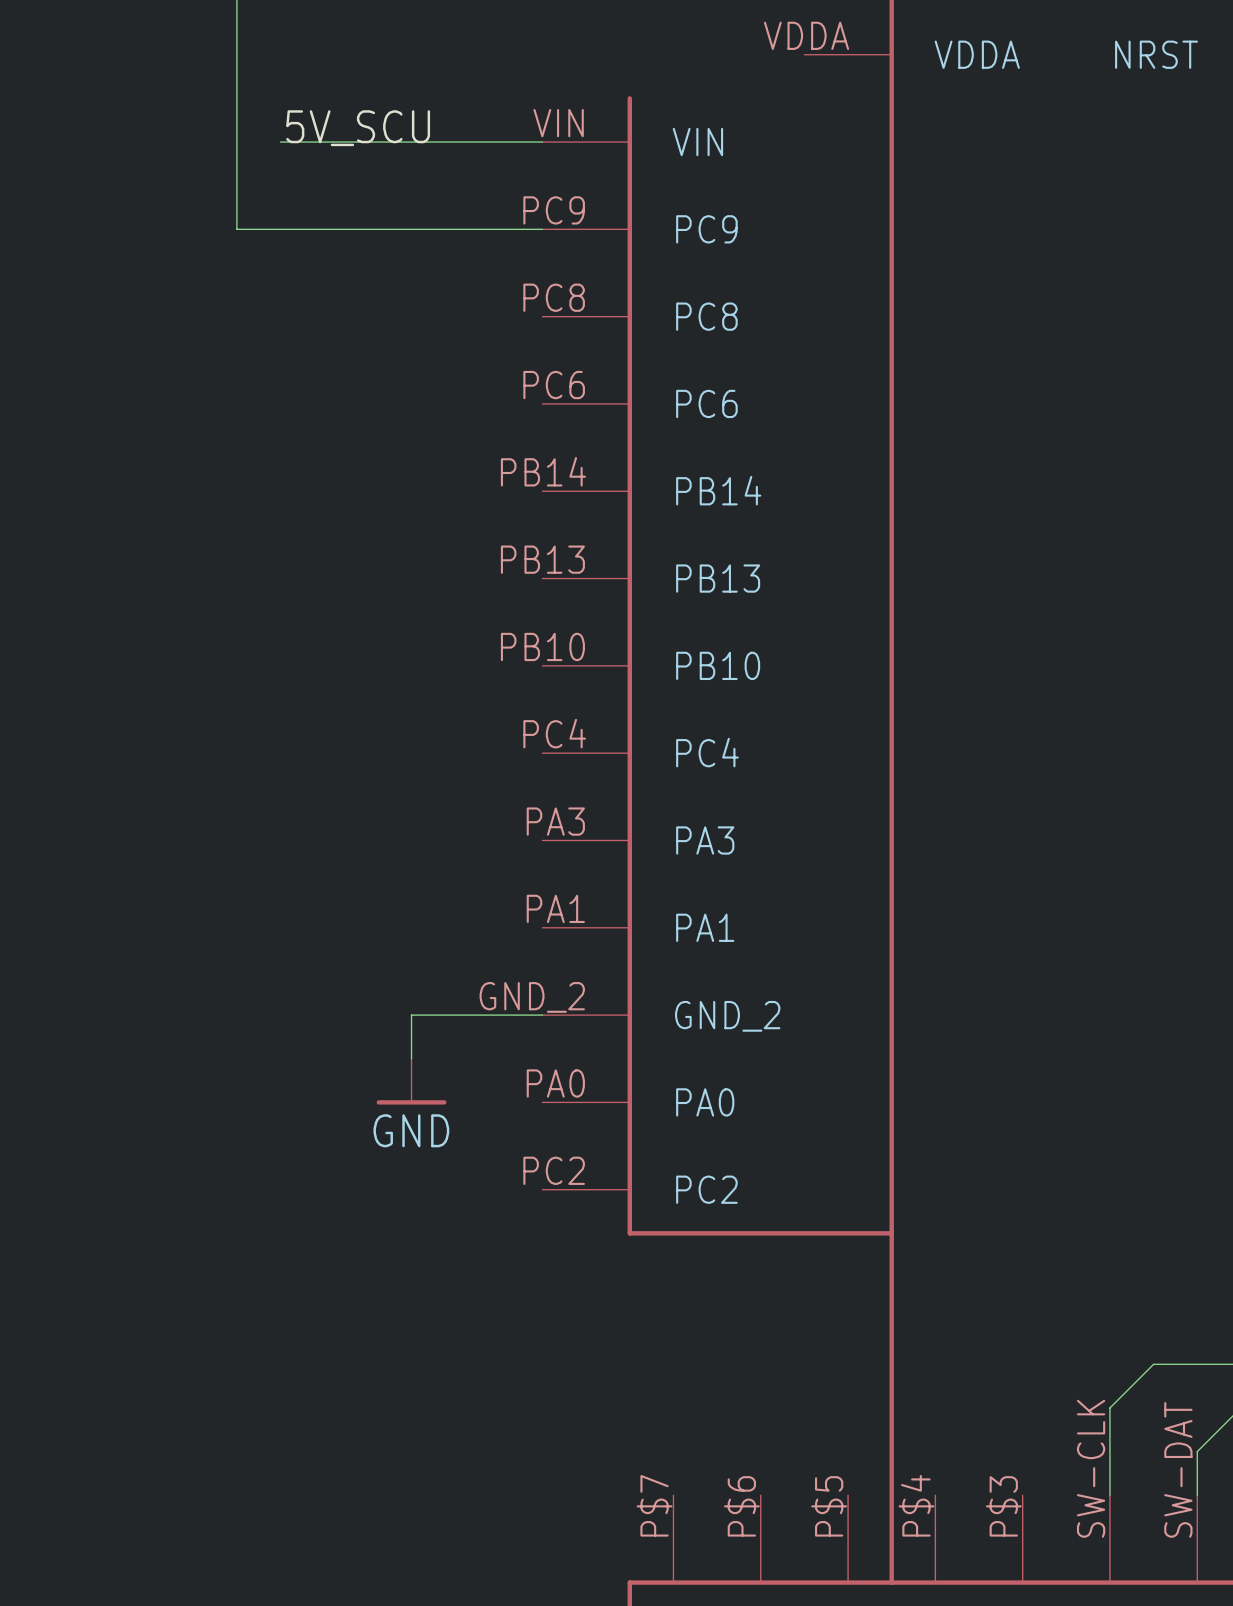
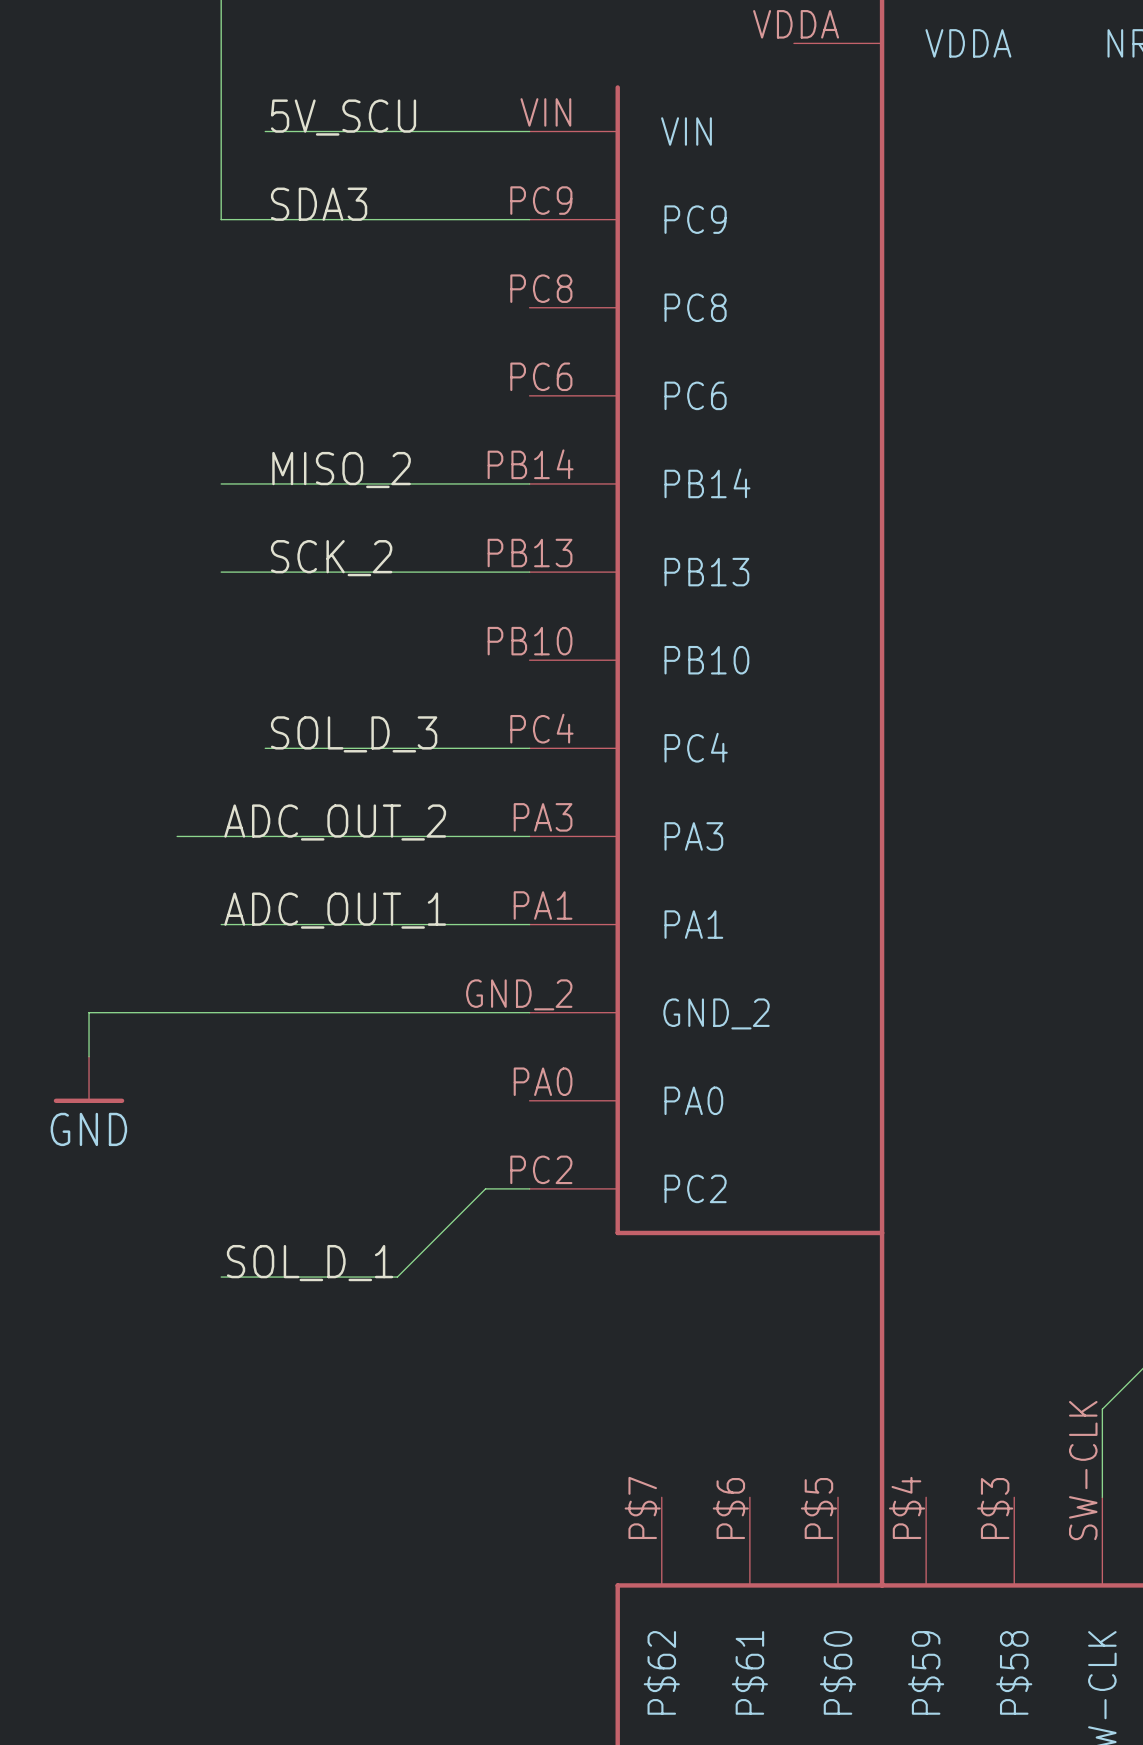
label: none -> SDA3 (319, 204)
label: none -> MISO_2 (341, 470)
wire: none -> (221, 483) (529, 483)
label: none -> SCK_2 (331, 558)
wire: none -> (221, 572) (529, 572)
label: none -> SOL_D_3 (354, 734)
wire: none -> (265, 748) (529, 748)
label: none -> ADC_OUT_2 (335, 822)
wire: none -> (177, 836) (529, 836)
label: none -> ADC_OUT_1 (335, 910)
wire: none -> (221, 924) (529, 924)
wire: (411, 1015) (411, 1058) -> (397, 1012) (89, 1012) (89, 1056)
power symbol position: GND (411, 1081) -> GND (89, 1079)
wire: none -> (529, 1188) (485, 1188) (397, 1277) (221, 1277)
label: none -> SOL_D_1 (310, 1263)

